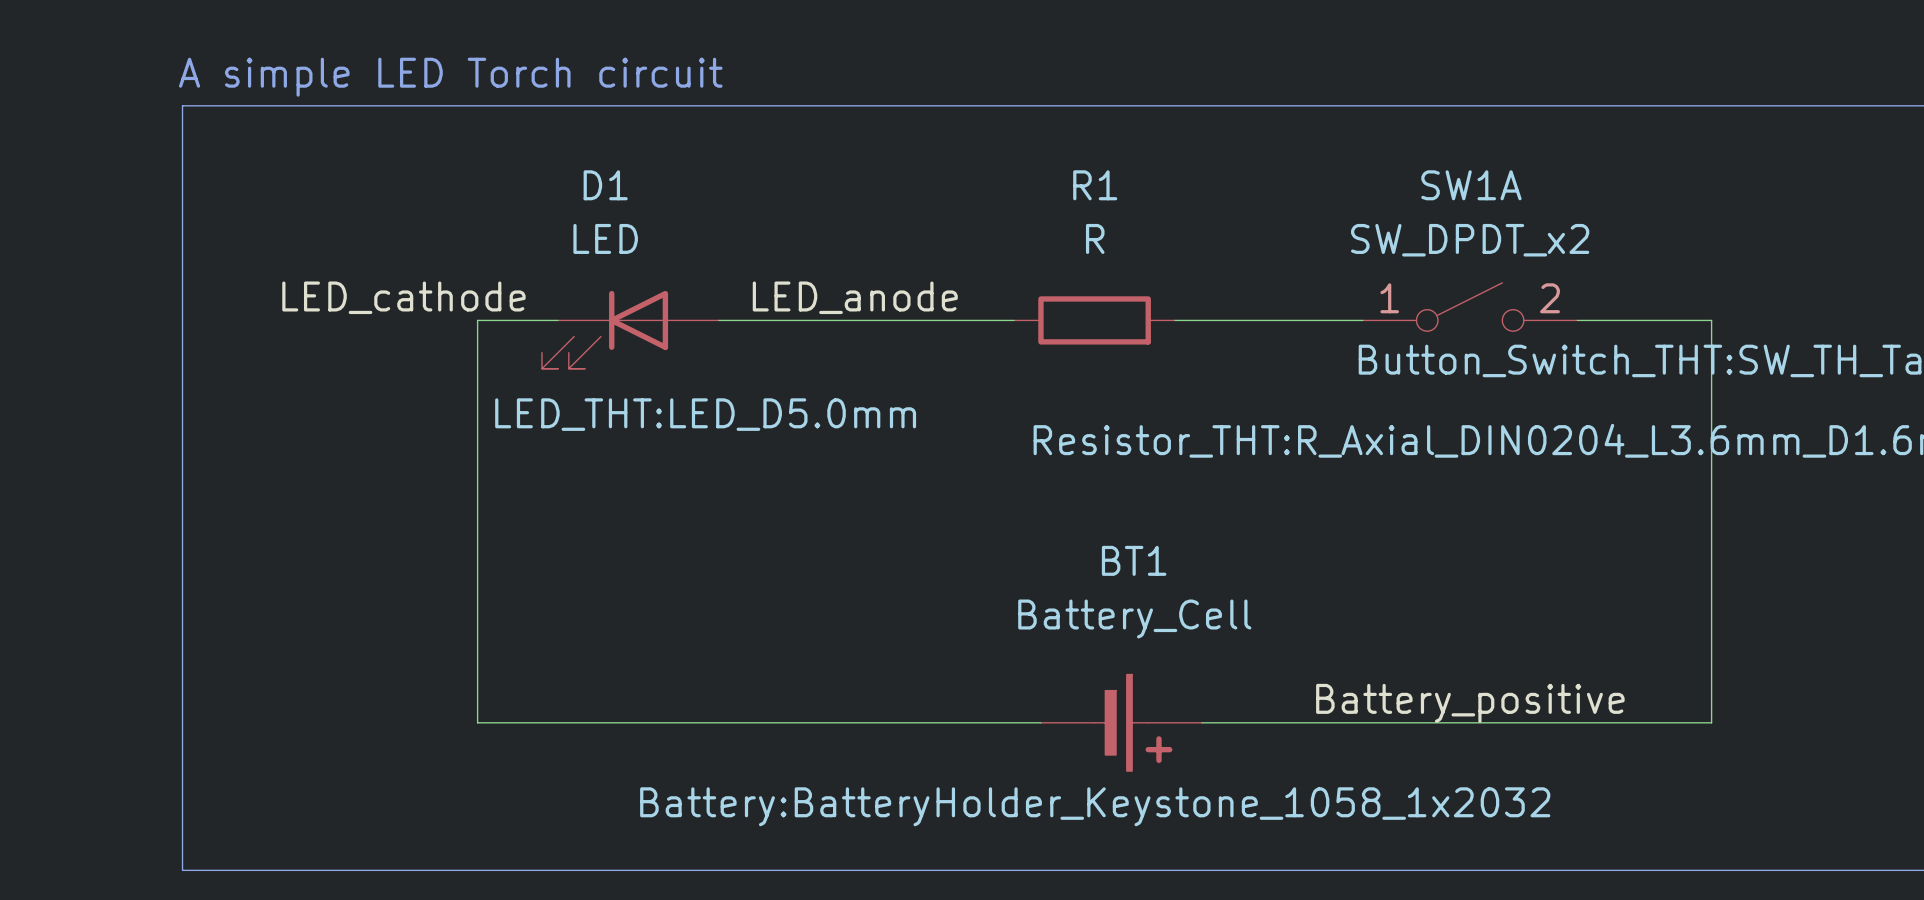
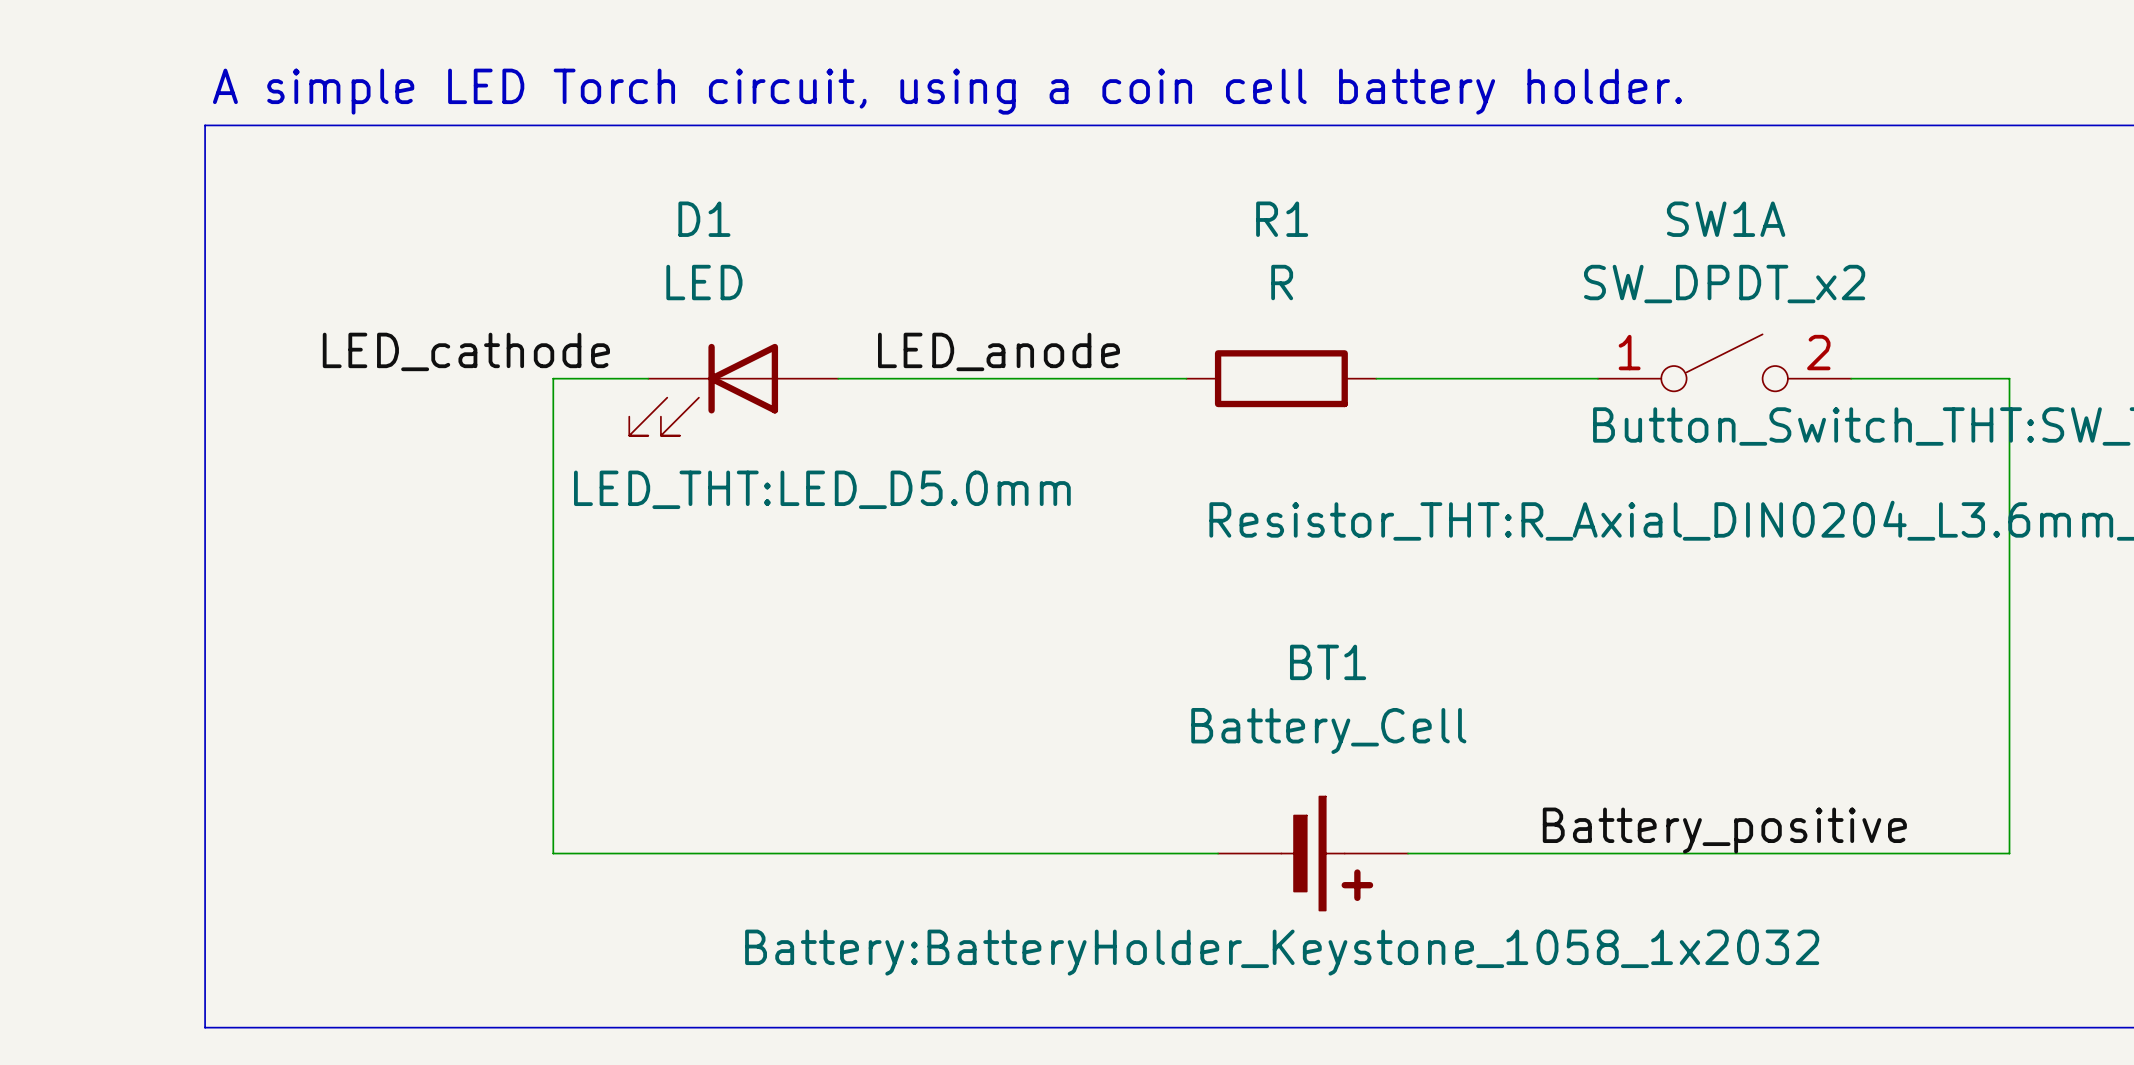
text: A simple LED Torch circuit (450, 77) -> none
text: none -> A simple LED Torch circuit, using a coin cell battery holder. (947, 91)

